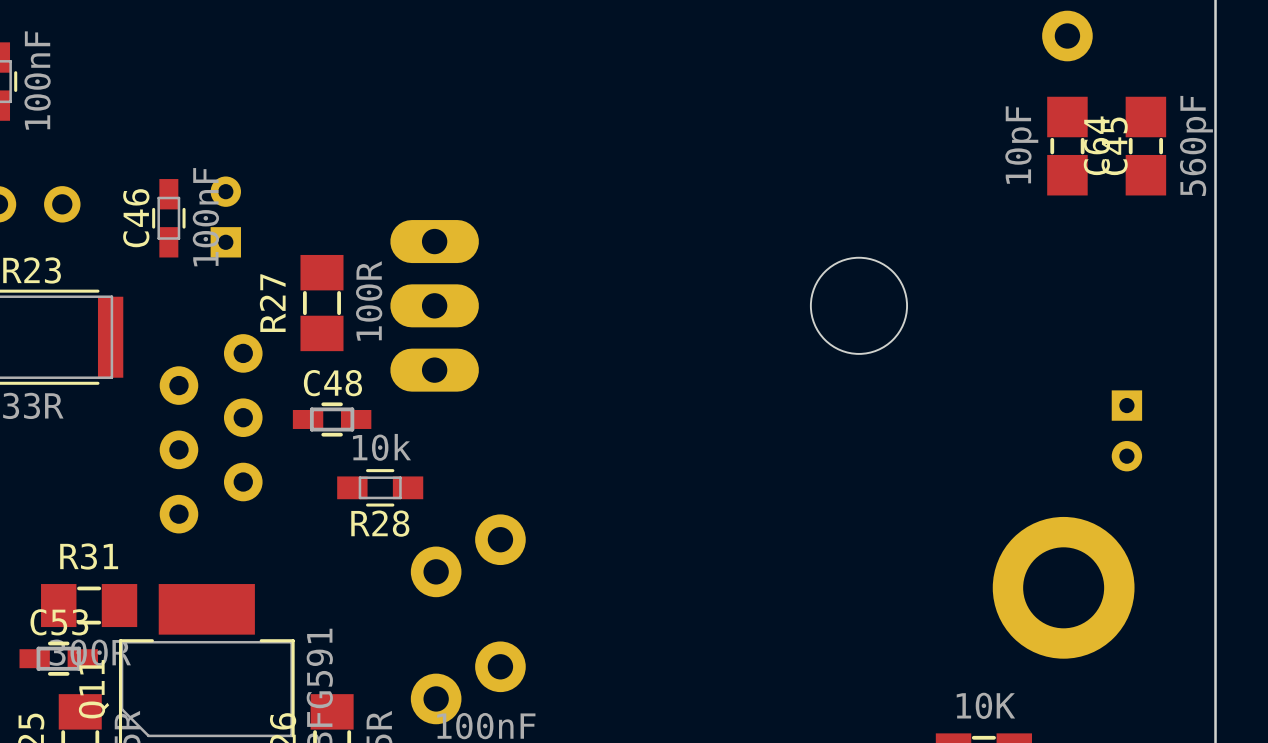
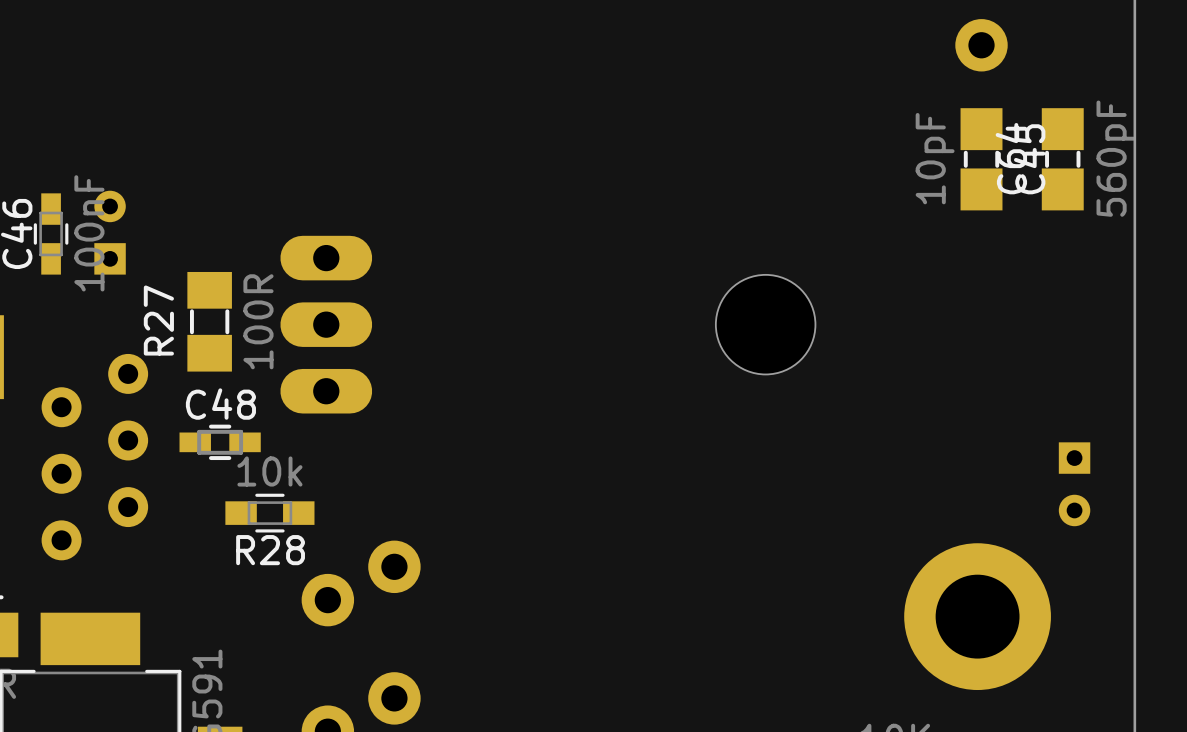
part position: (1126, 430) -> (1074, 484)

